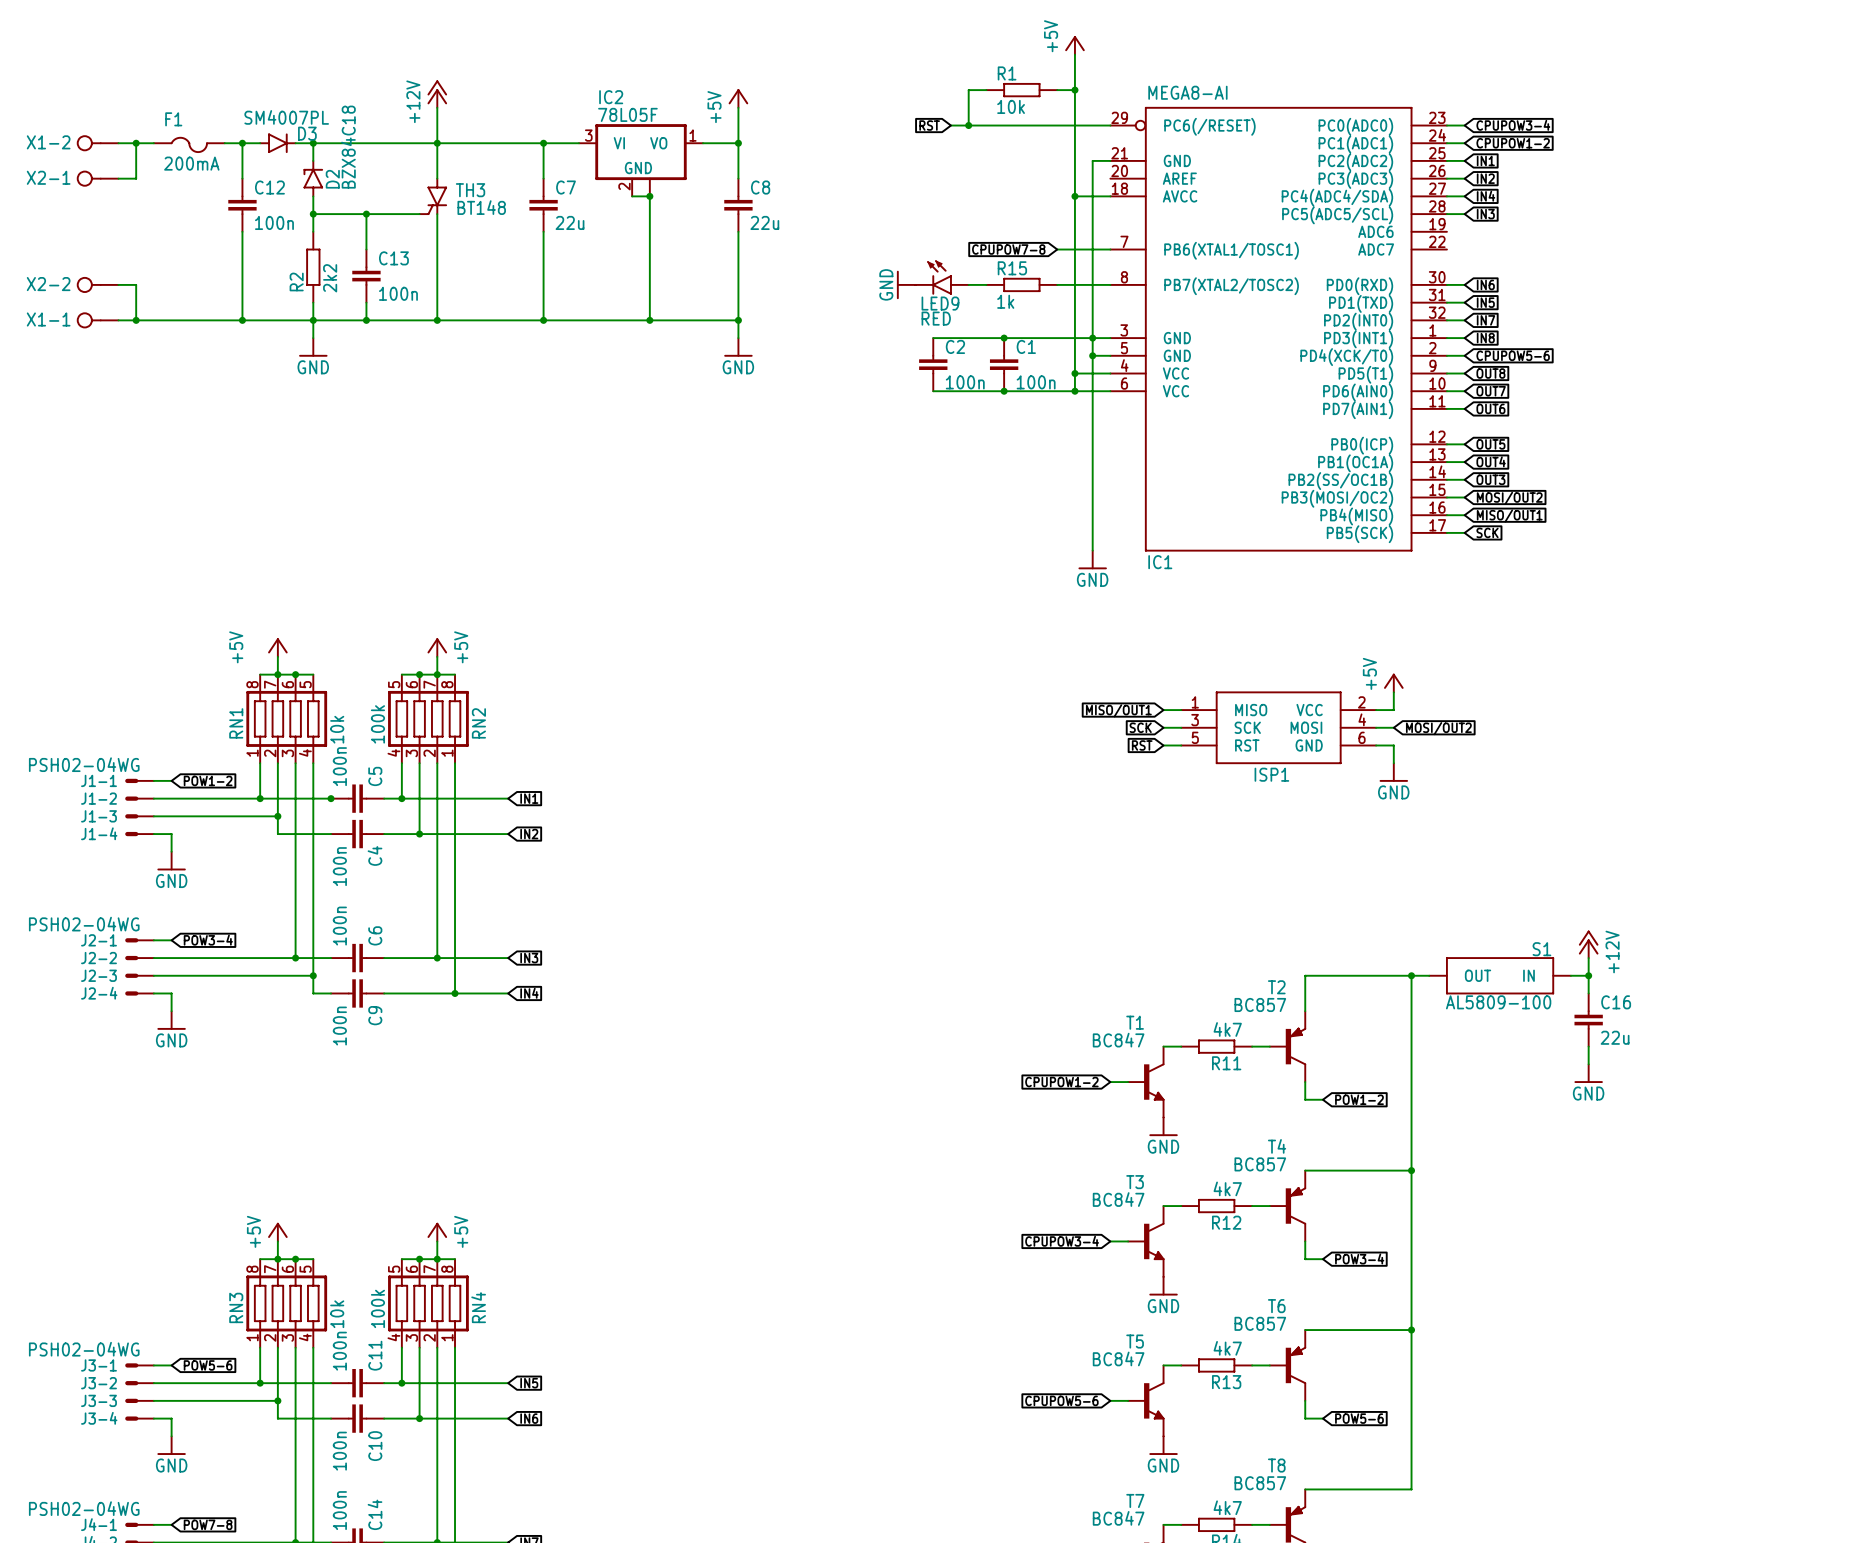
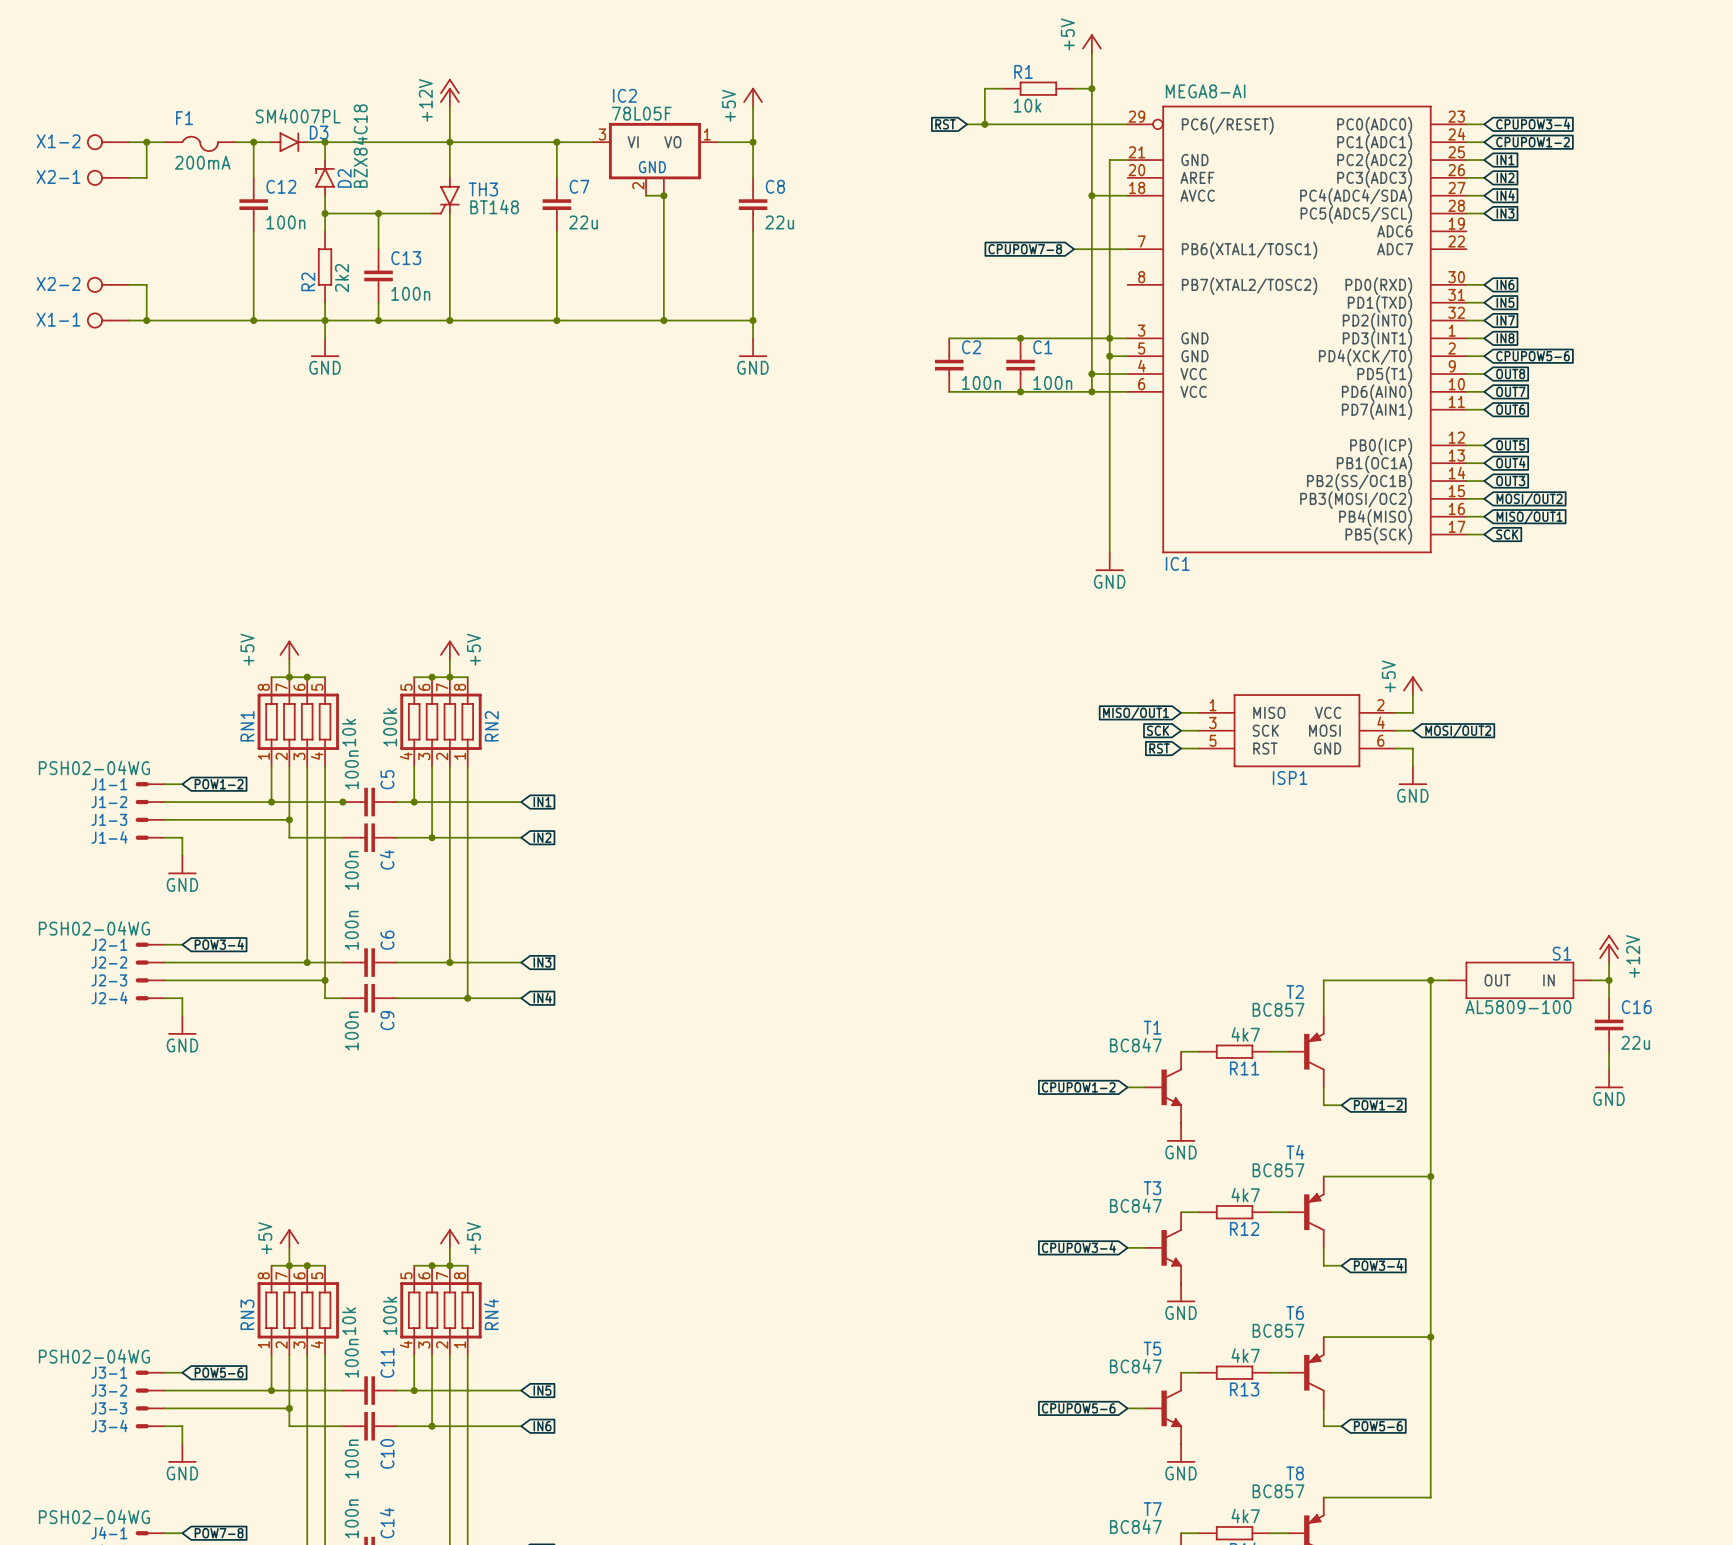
LED9: RED (942, 277) -> none
power symbol: GND (906, 284) -> none
wire: (968, 284) (986, 284) -> none
R15: 1k (1021, 284) -> none
wire: (1057, 284) (1110, 284) -> none

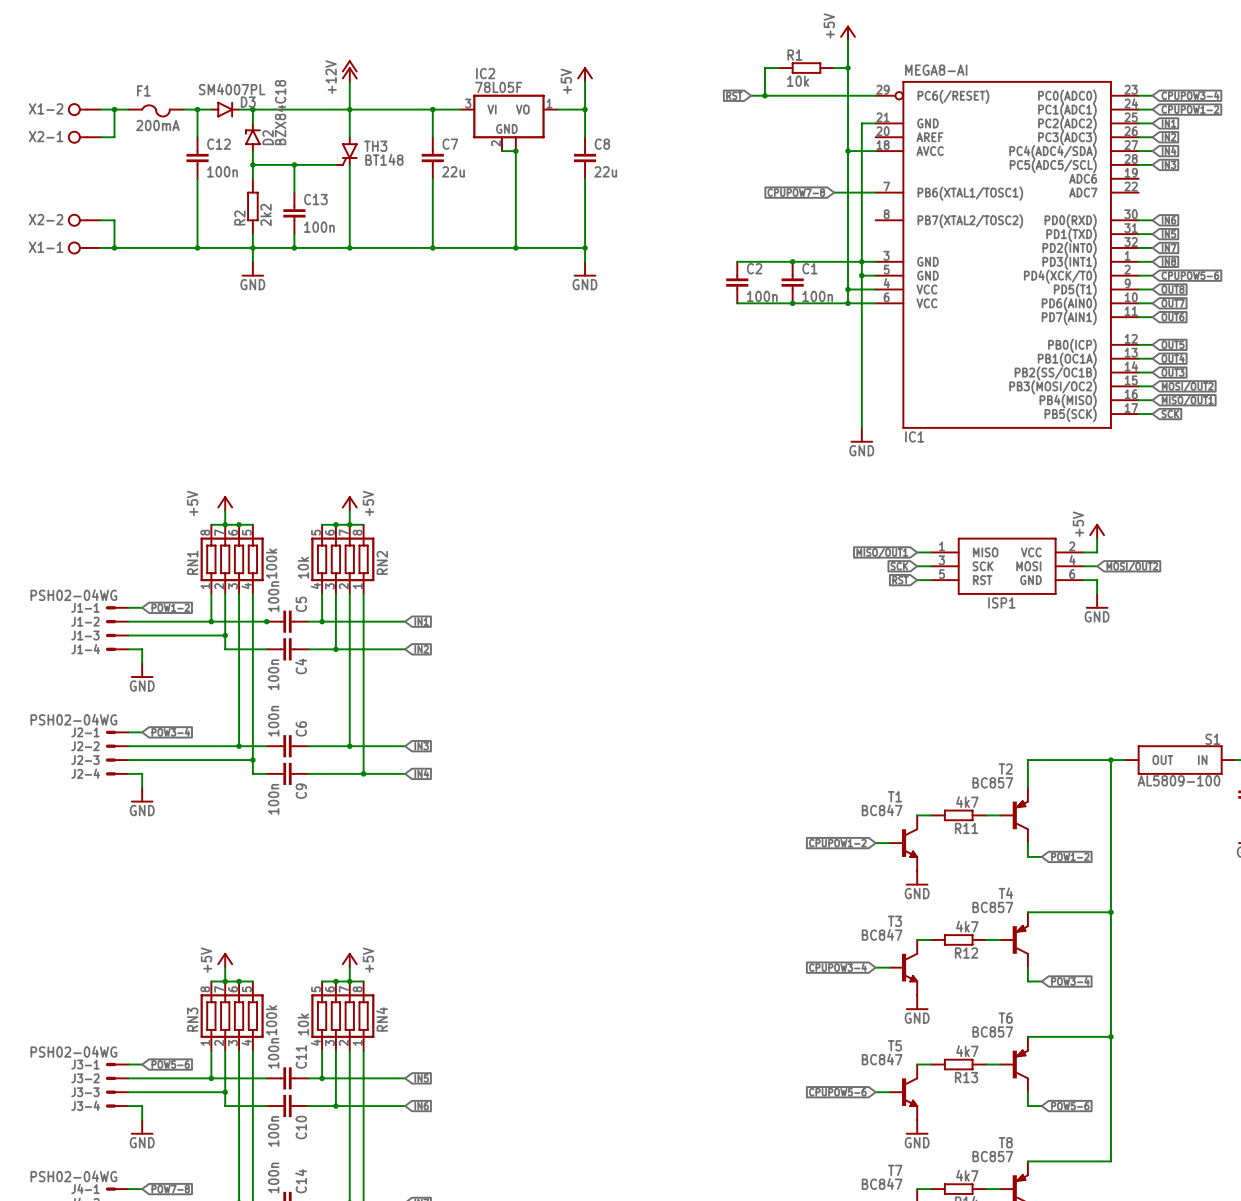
RN2 value: 100k (390, 727) -> 10k (303, 567)
RN1 value: 10k (349, 732) -> 100k (271, 563)
RN4 value: 100k (390, 1315) -> 10k (303, 1024)
RN3 value: 10k (349, 1321) -> 100k (271, 1020)

